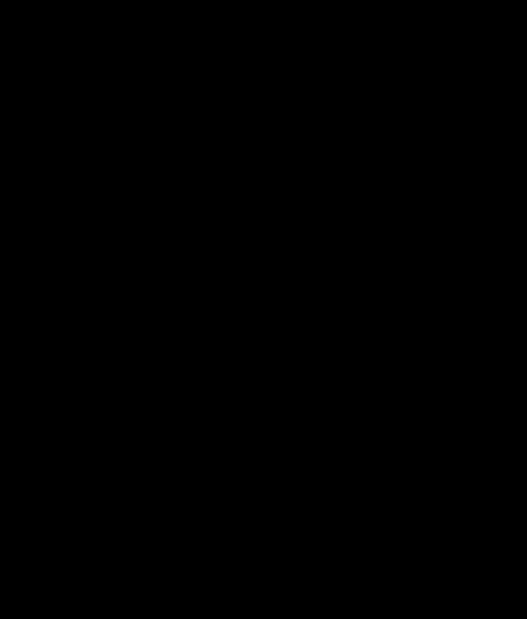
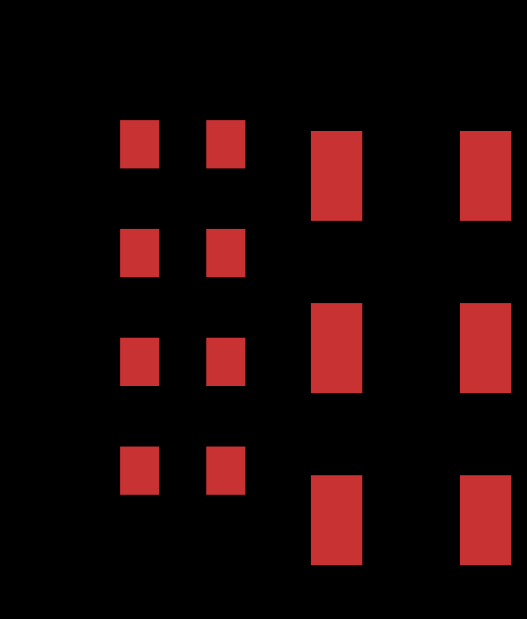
part: none -> (182, 144)
part: none -> (411, 175)
part: none -> (182, 253)
part: none -> (411, 348)
part: none -> (182, 361)
part: none -> (182, 470)
part: none -> (411, 520)

